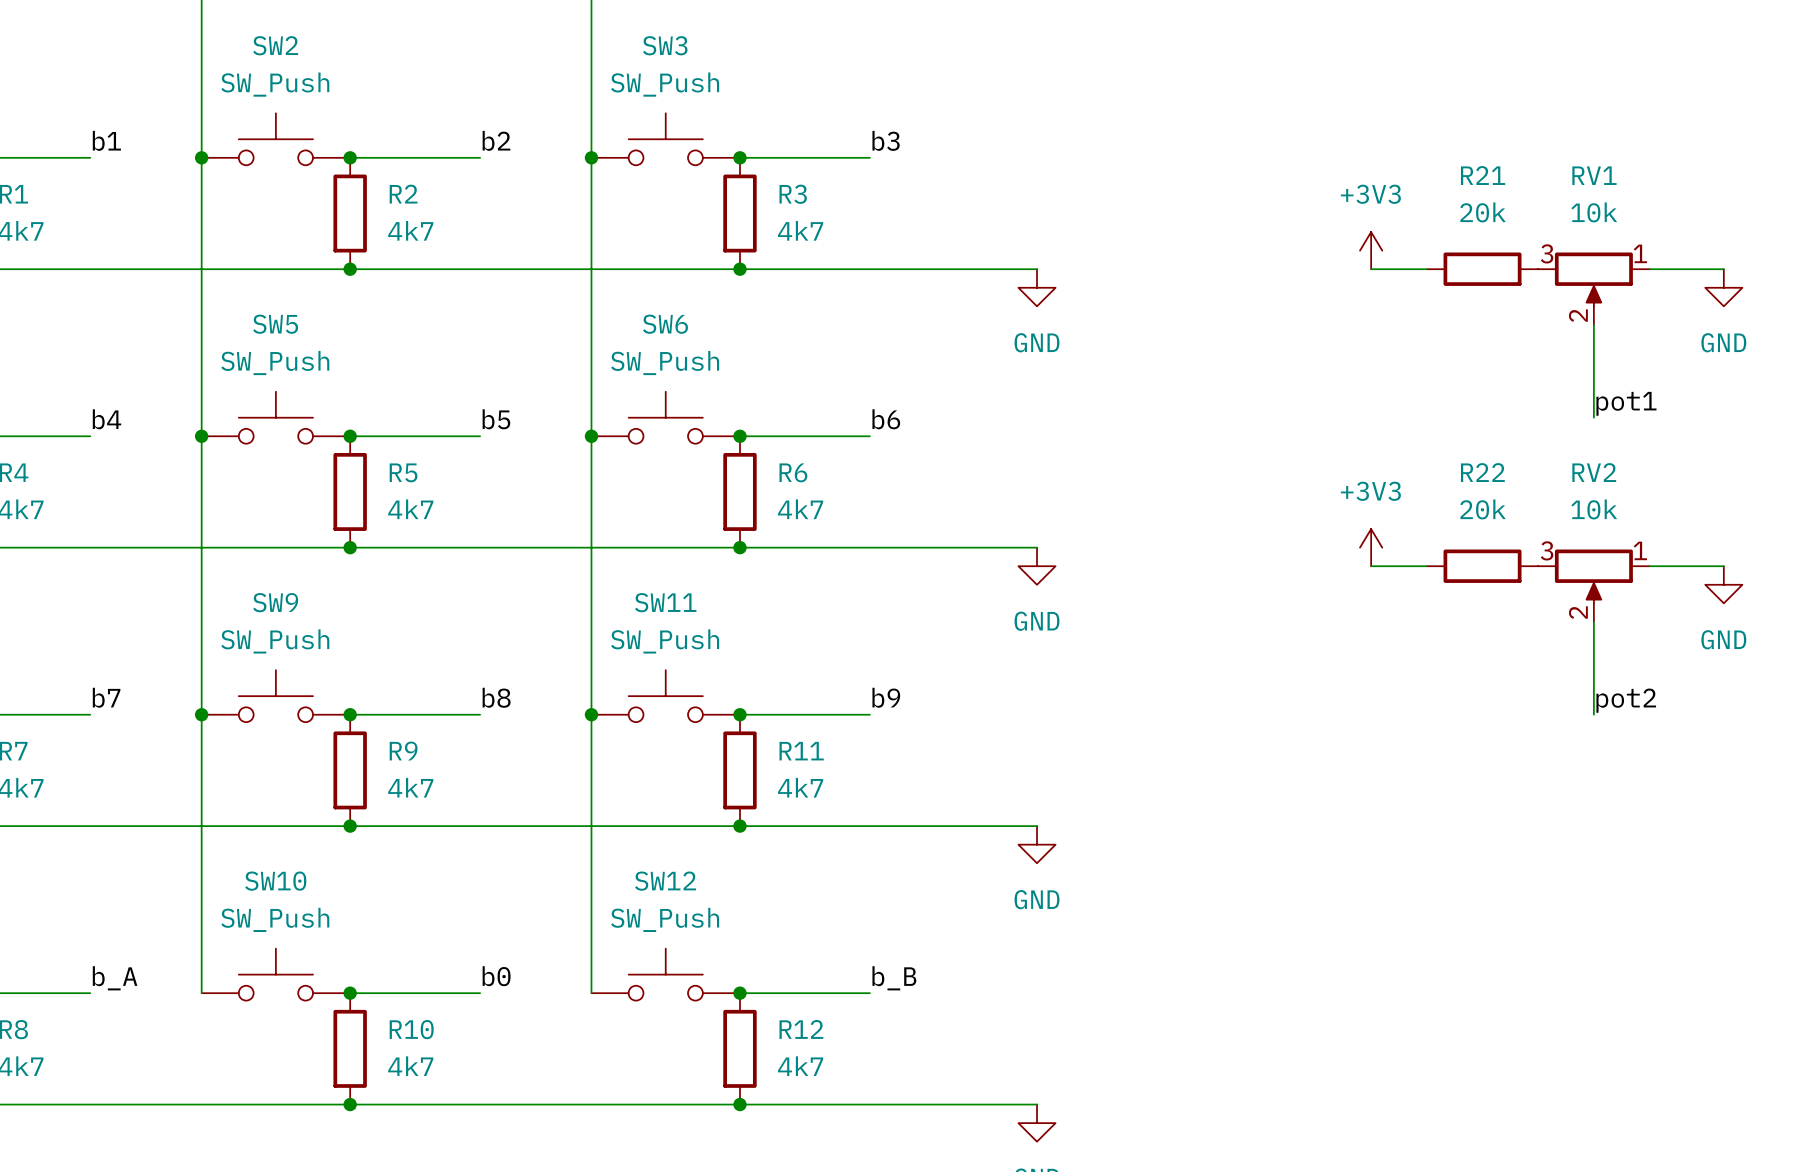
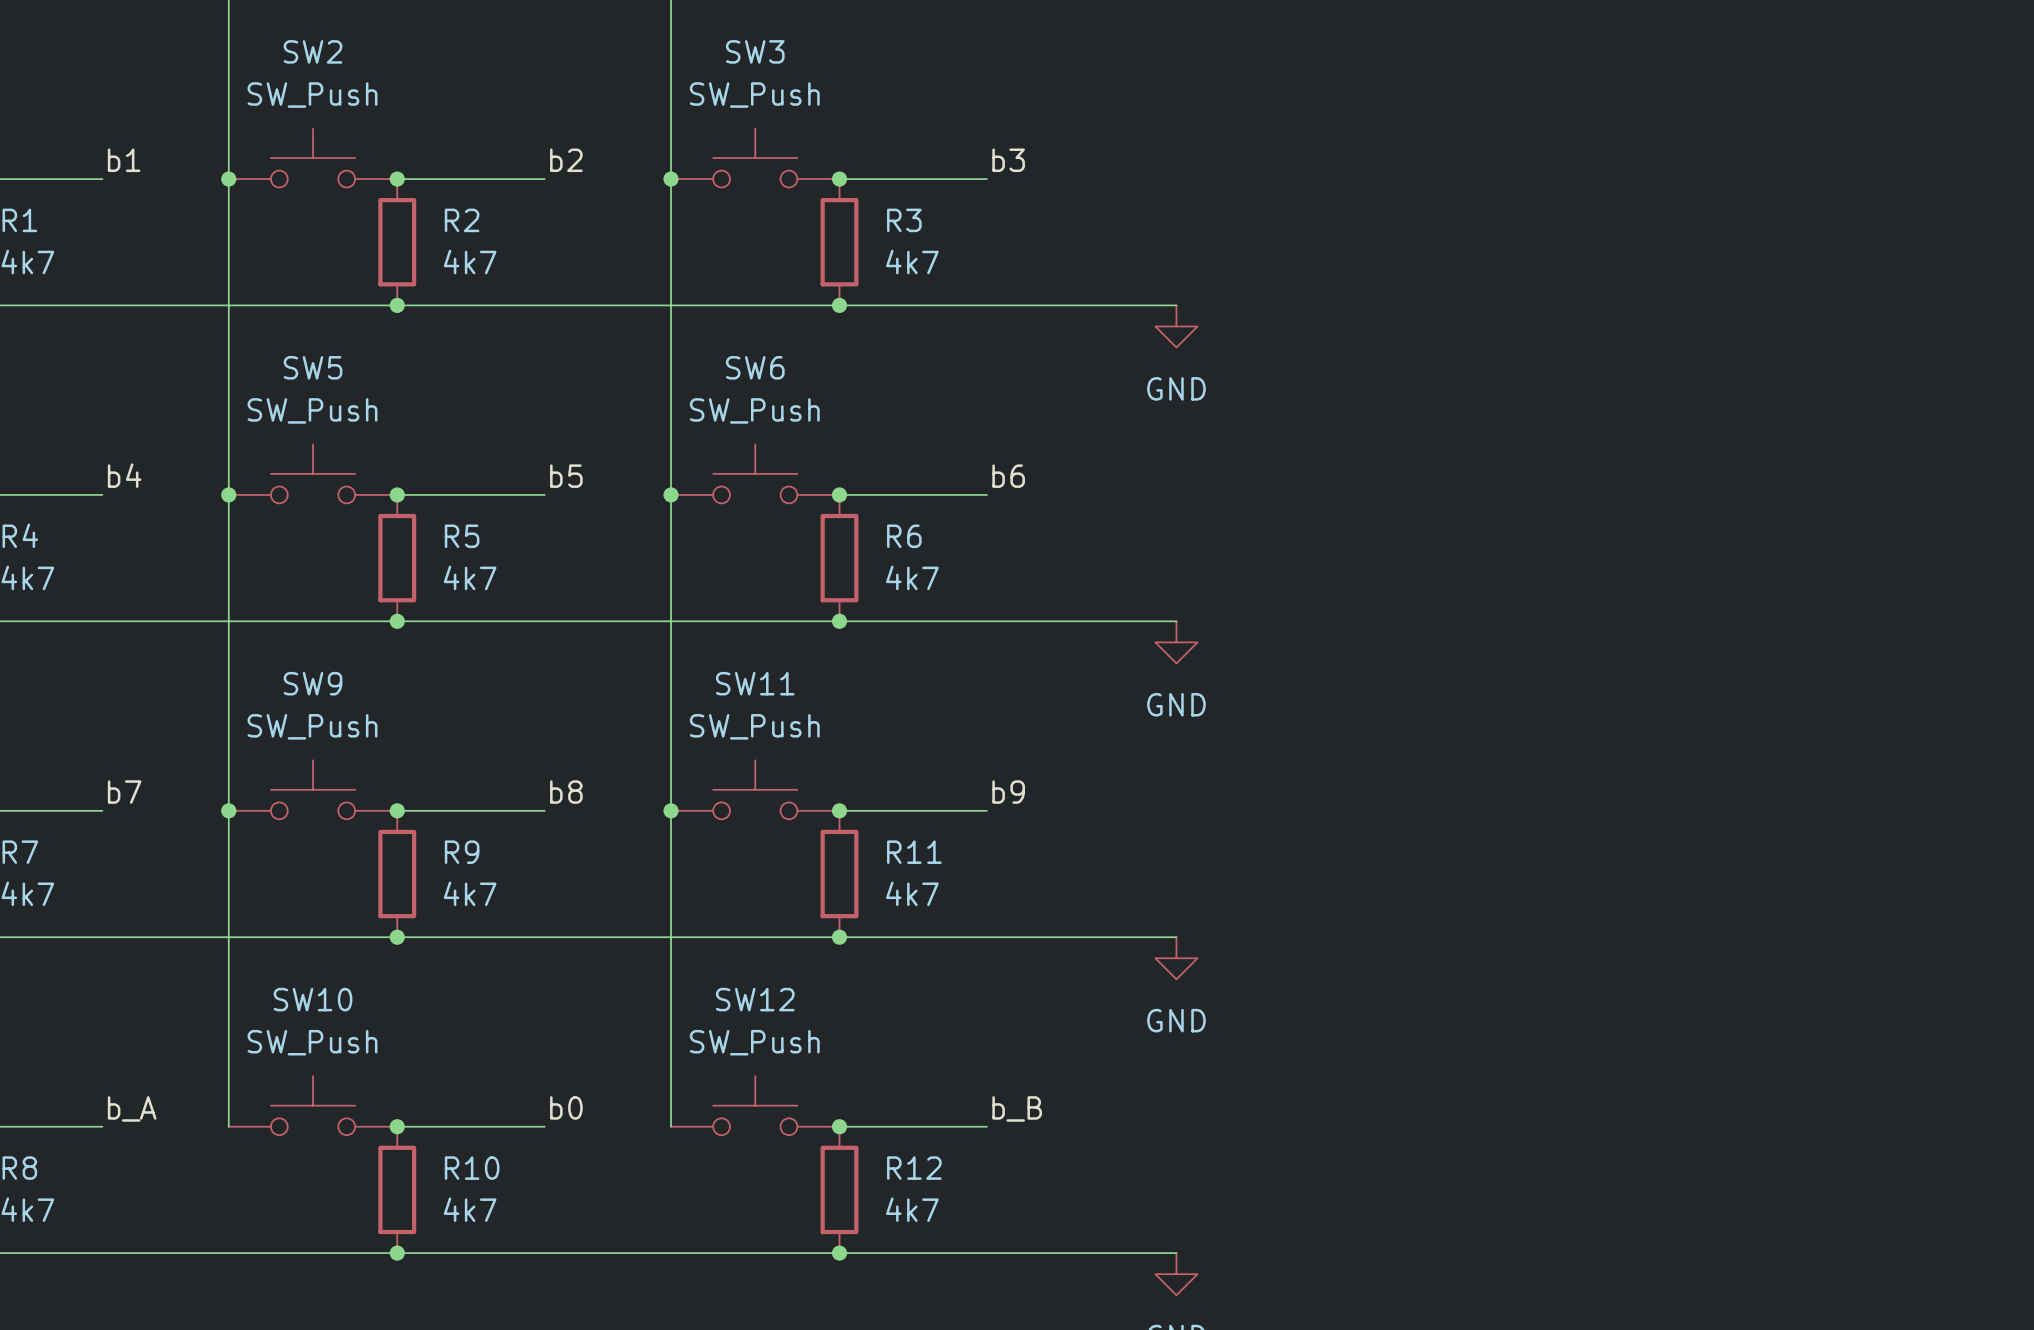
power symbol: +3V3 (1371, 250) -> none
wire: (1371, 269) (1426, 269) -> none
R21: 20k (1482, 269) -> none
wire: (1649, 269) (1723, 269) -> none
power symbol: GND (1723, 287) -> none
RV1: 10k (1593, 288) -> none
wire: (1593, 324) (1593, 417) -> none
label: pot1 (1626, 403) -> none
power symbol: +3V3 (1371, 547) -> none
wire: (1371, 566) (1426, 566) -> none
R22: 20k (1482, 566) -> none
wire: (1649, 566) (1723, 566) -> none
power symbol: GND (1723, 584) -> none
RV2: 10k (1593, 585) -> none
wire: (1593, 621) (1593, 714) -> none
label: pot2 (1626, 700) -> none

